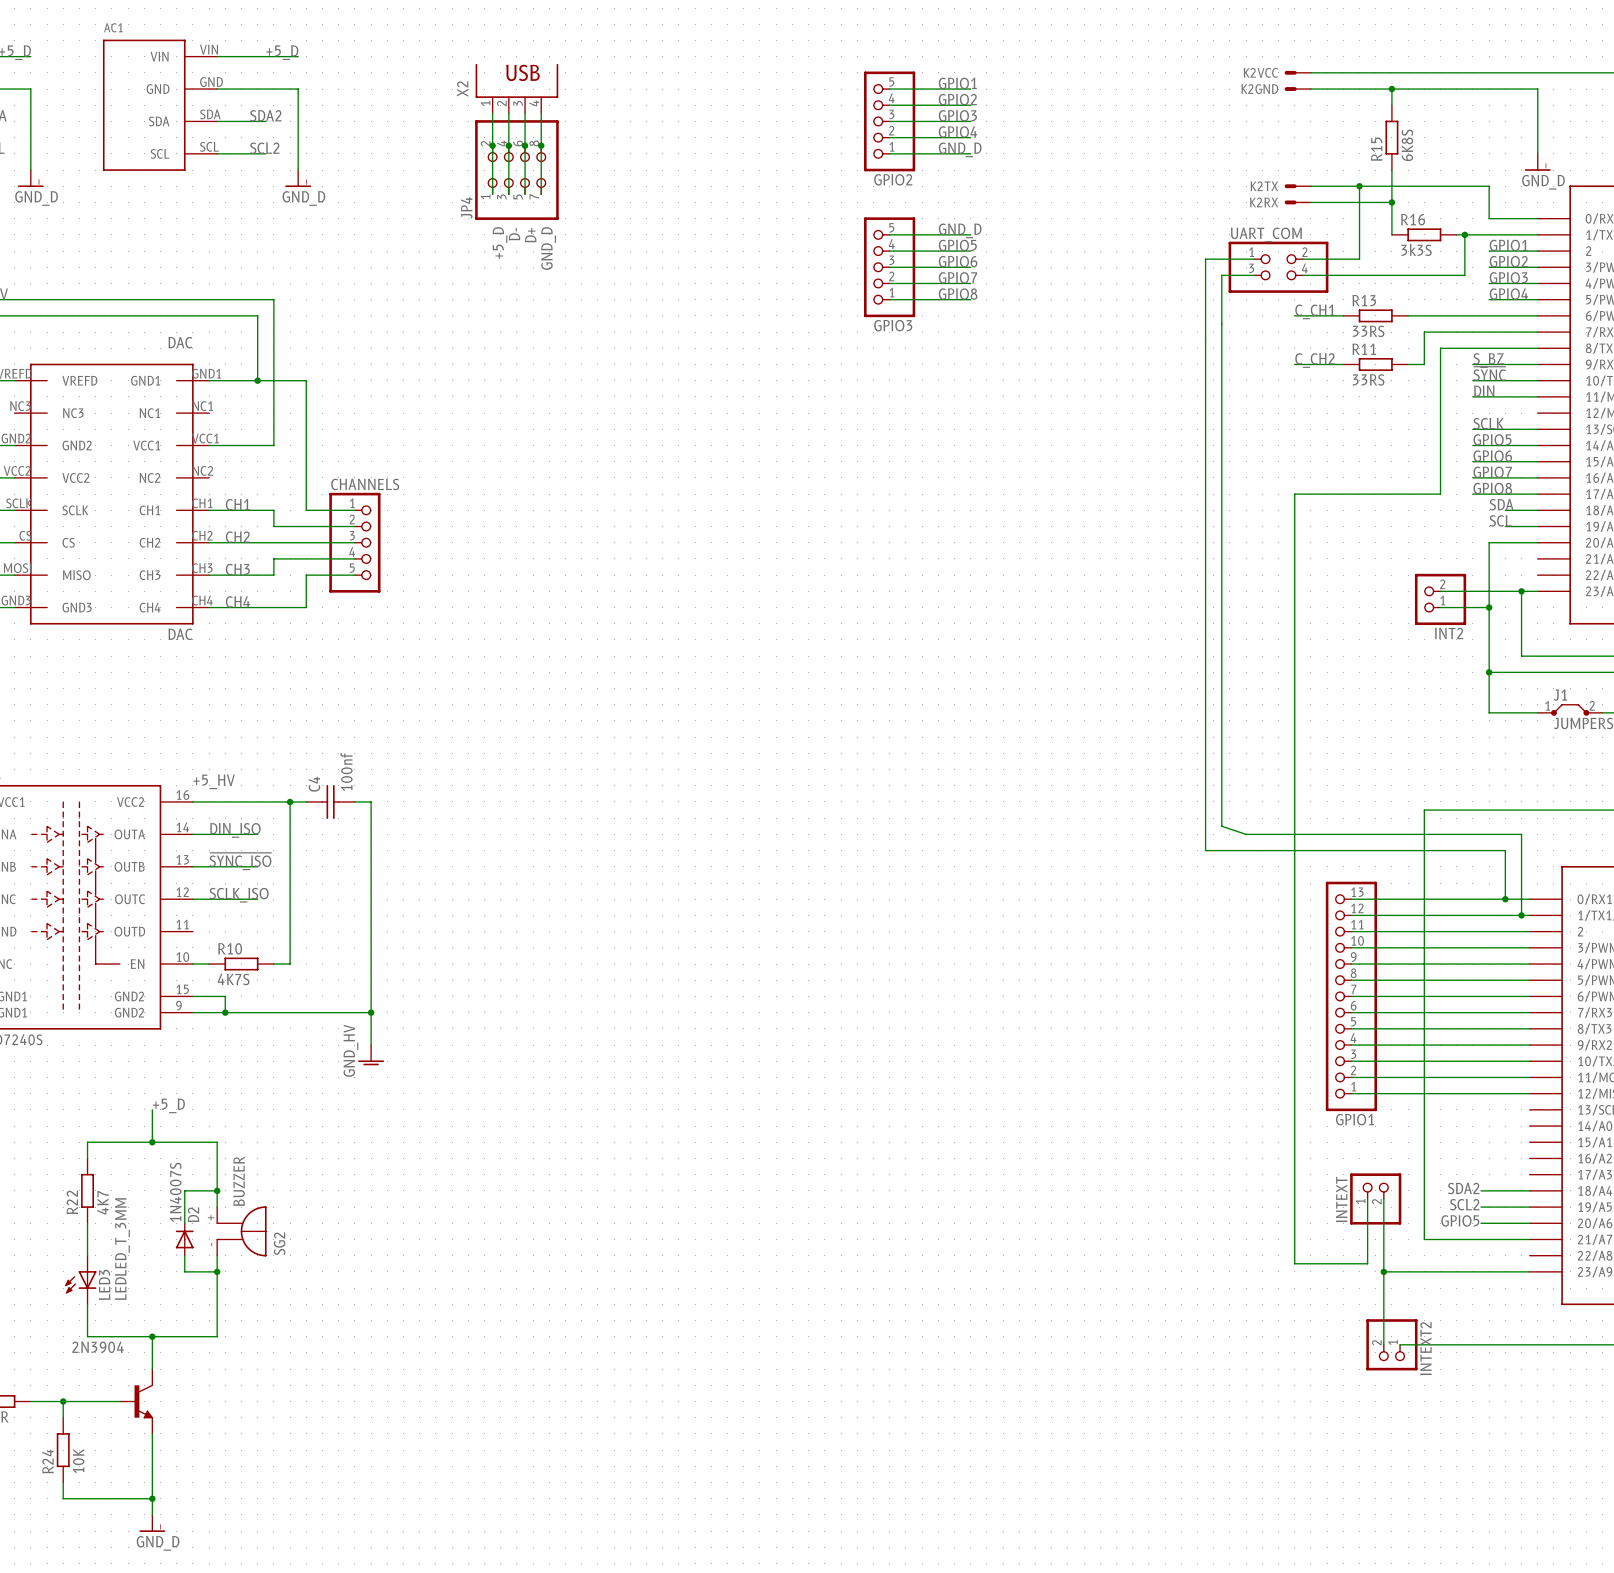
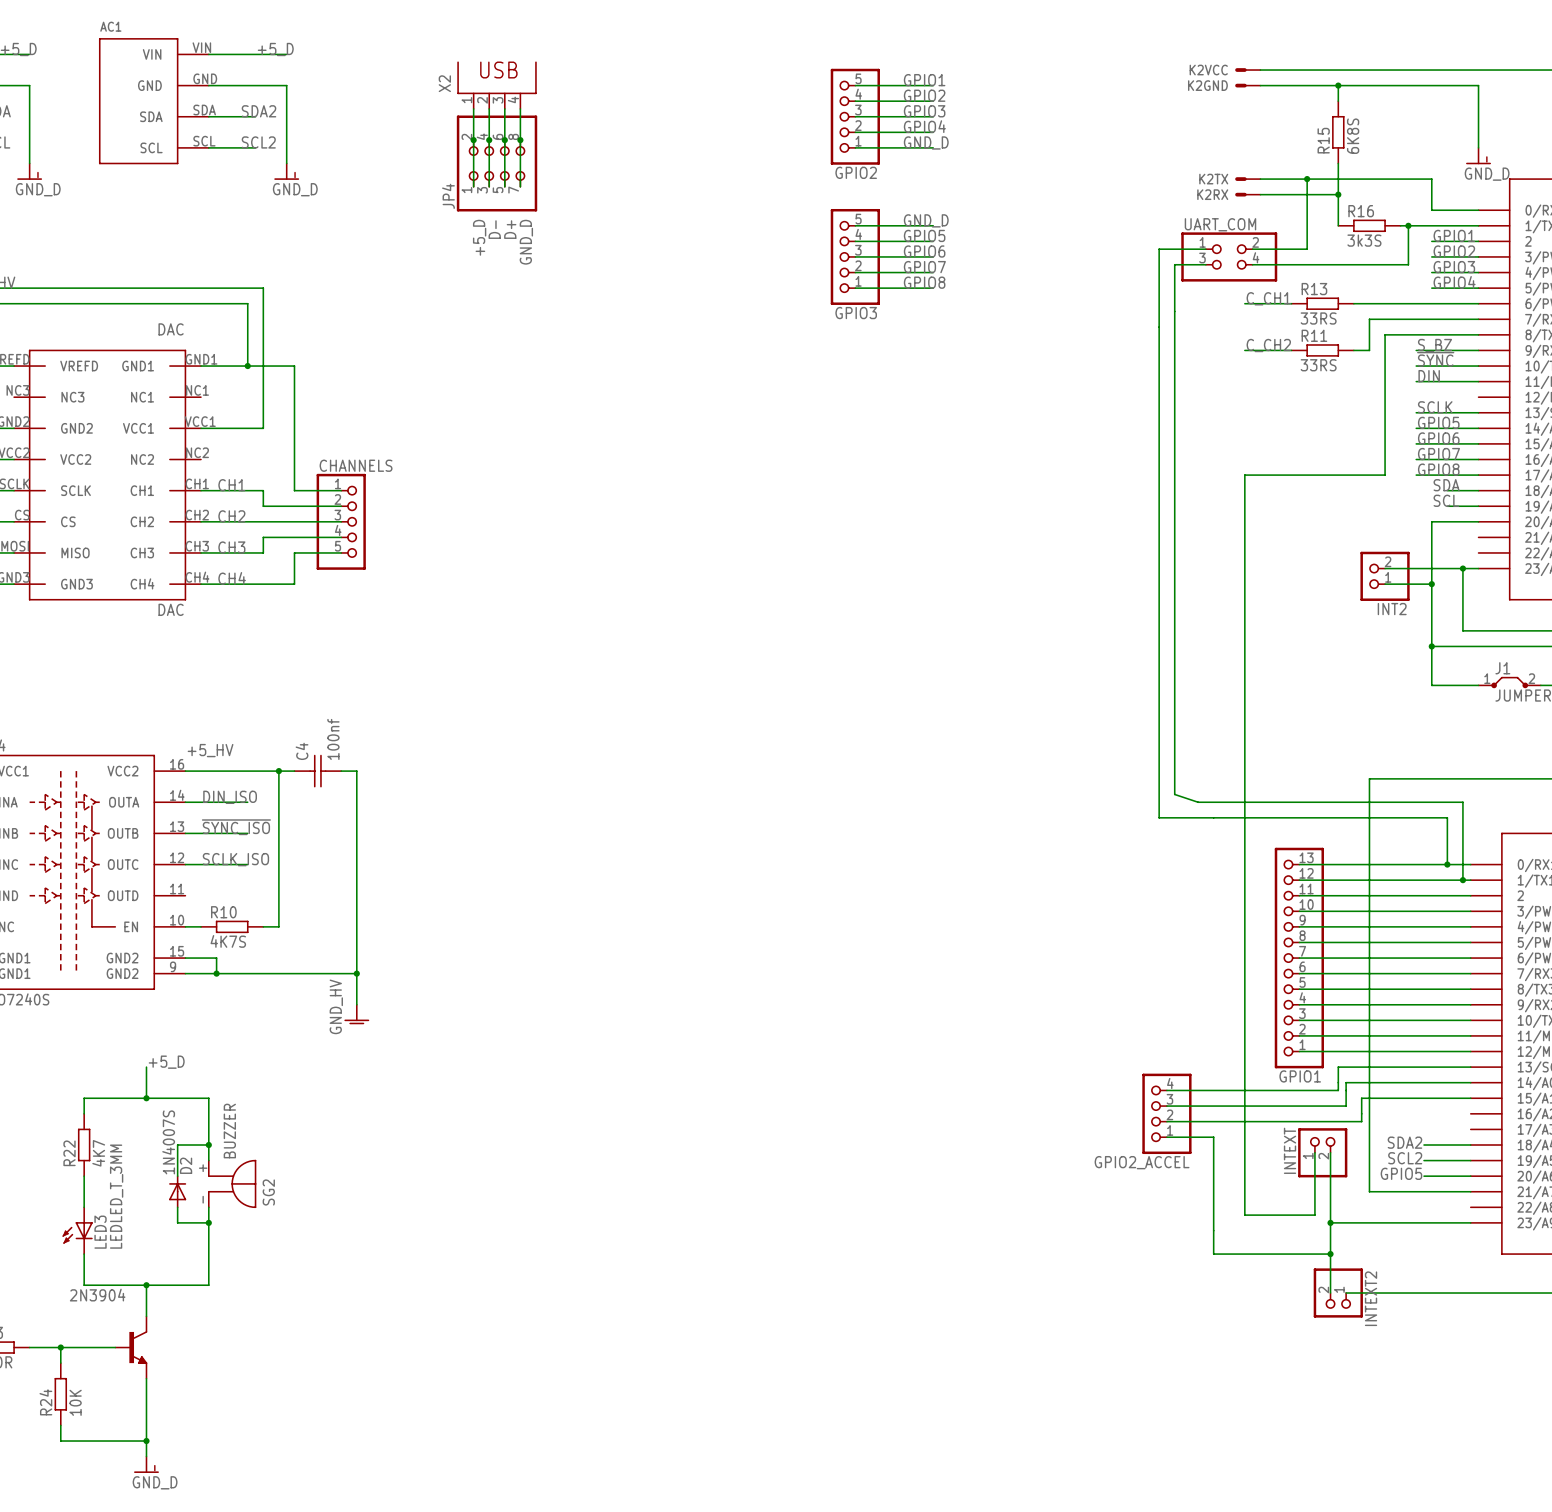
wire: none -> (1470, 1067) (1338, 1067) (1338, 1090) (1166, 1090)
wire: none -> (1470, 1082) (1346, 1082) (1346, 1106) (1166, 1106)
wire: none -> (1470, 1098) (1361, 1098) (1361, 1121) (1166, 1121)
GPIO2_ACCEL: none -> (1166, 1113)
wire: none -> (1166, 1137) (1213, 1137) (1213, 1254) (1330, 1254)
junction: none -> (1330, 1254)

